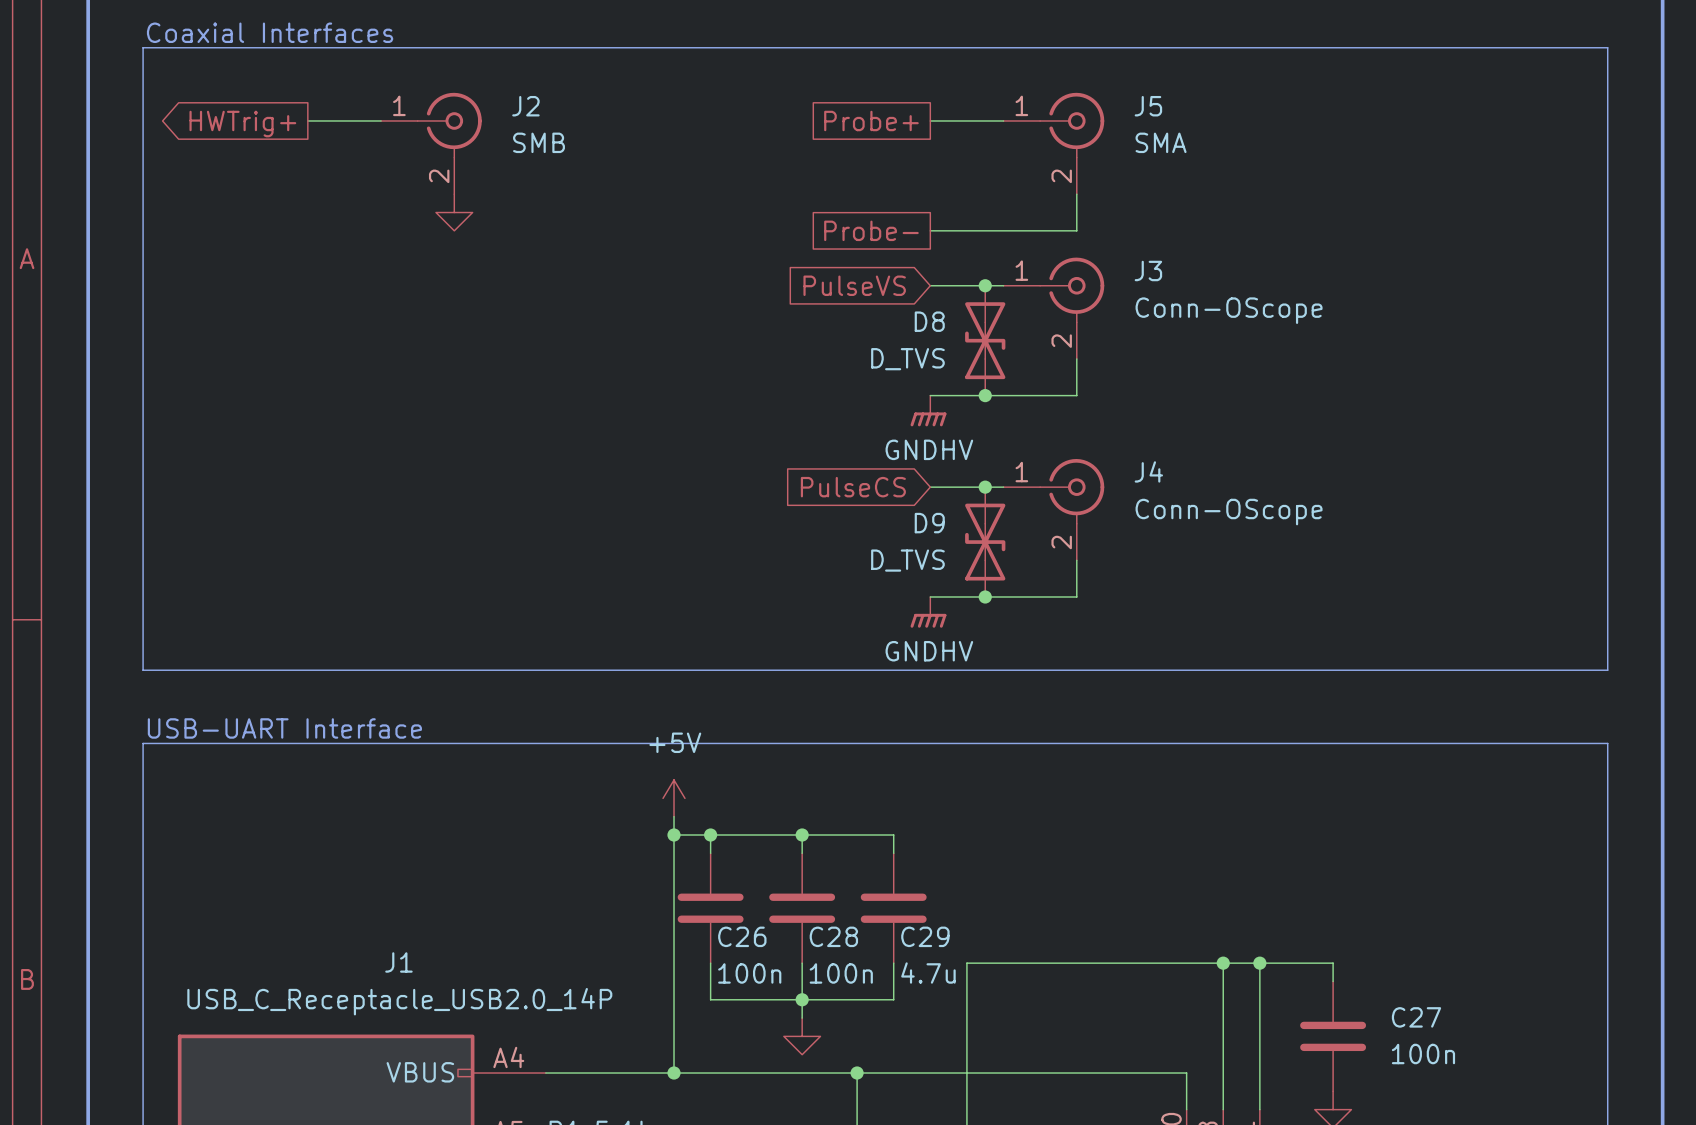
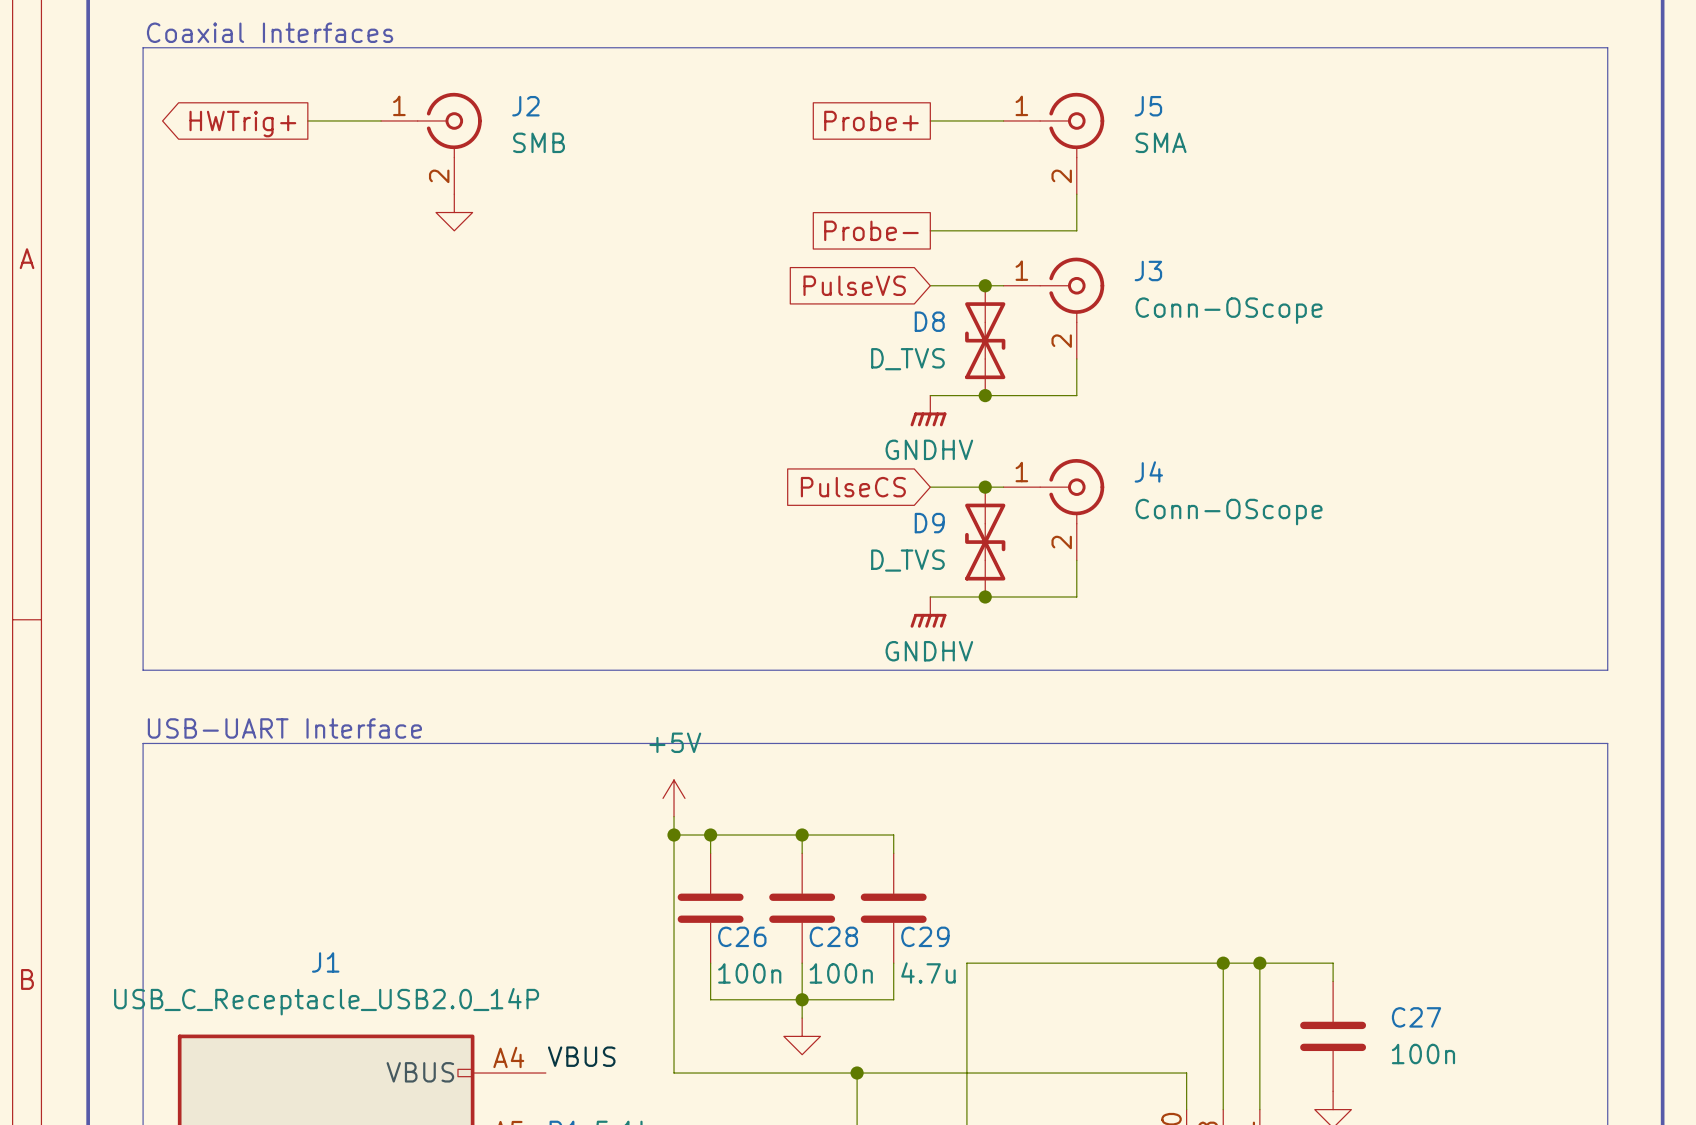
J1 name position: J1 (398, 962) -> J1 (325, 962)
J1 value position: USB_C_Receptacle_USB2.0_14P (399, 1001) -> USB_C_Receptacle_USB2.0_14P (326, 1001)
label: none -> VBUS (581, 1056)
wire: (545, 1073) (674, 1073) -> none
junction: (674, 1073) -> none

